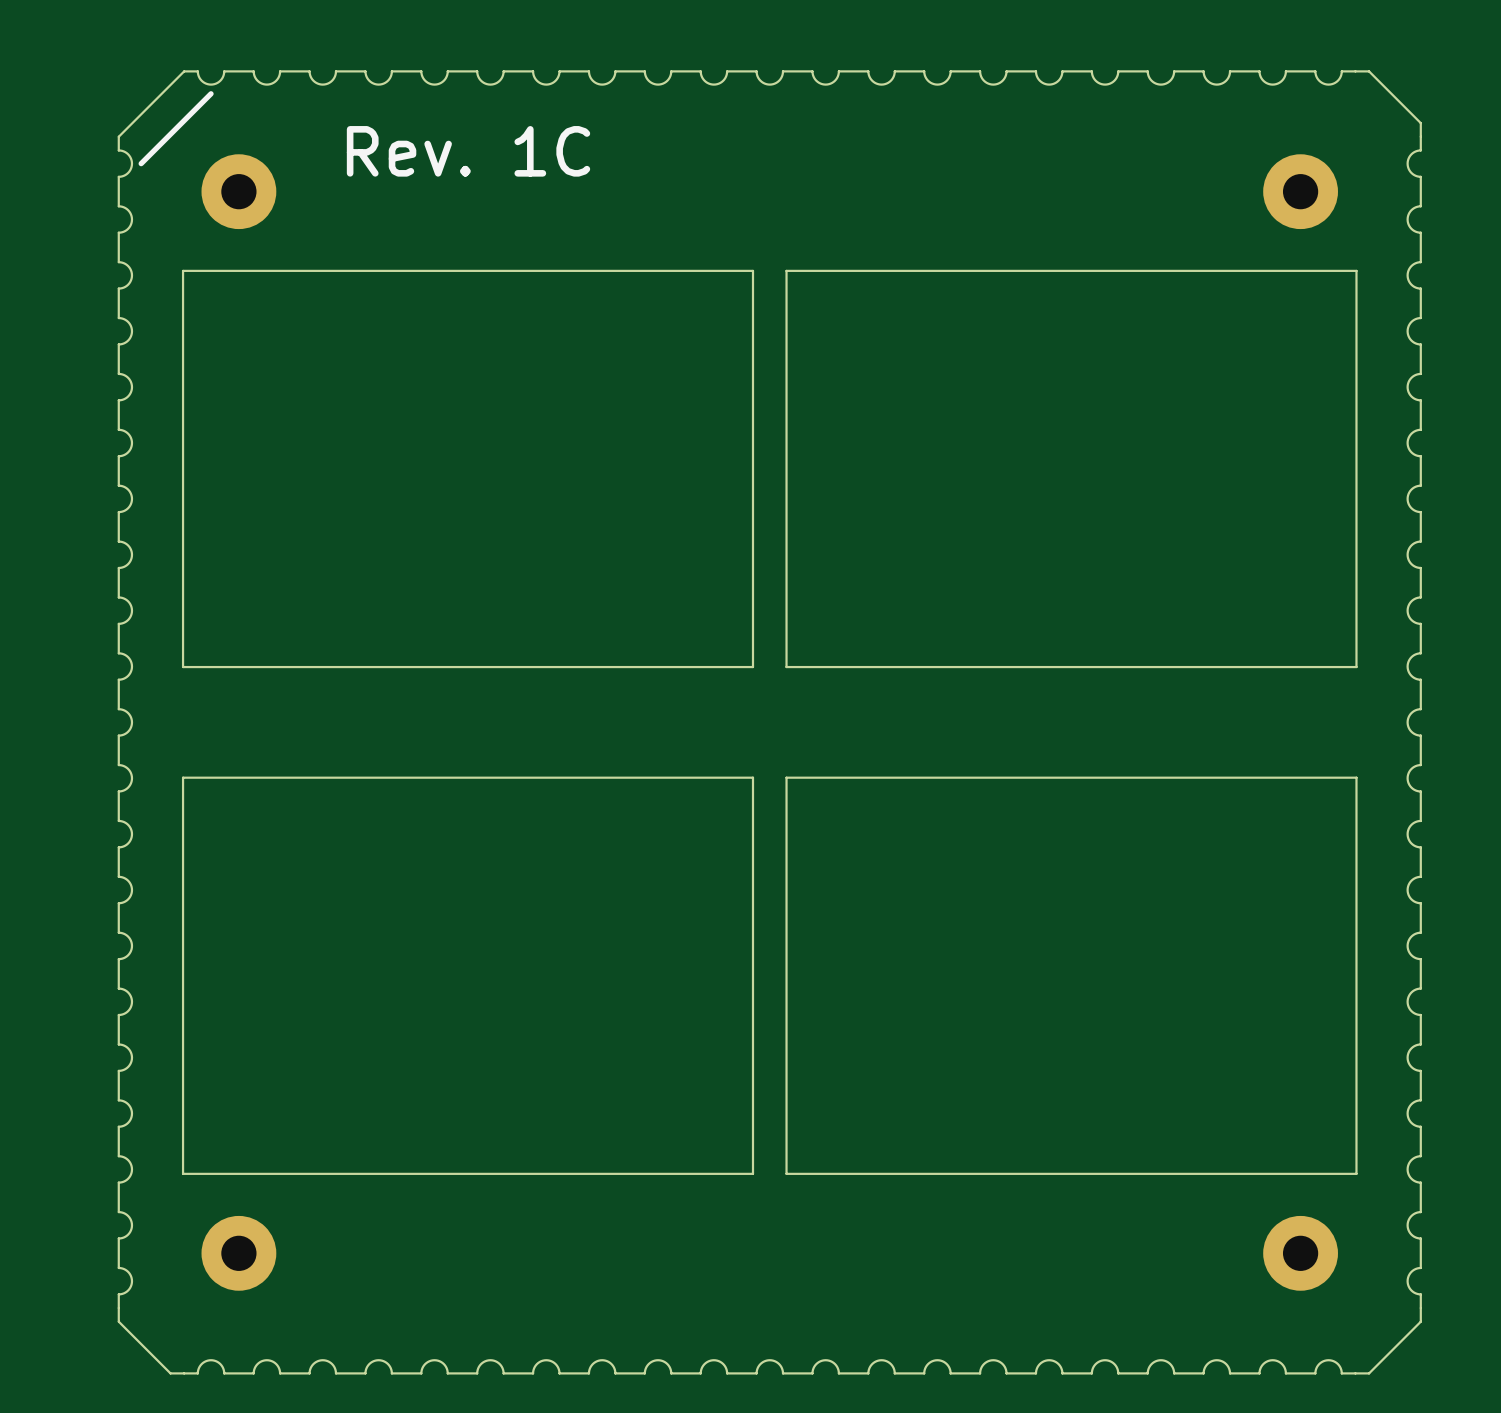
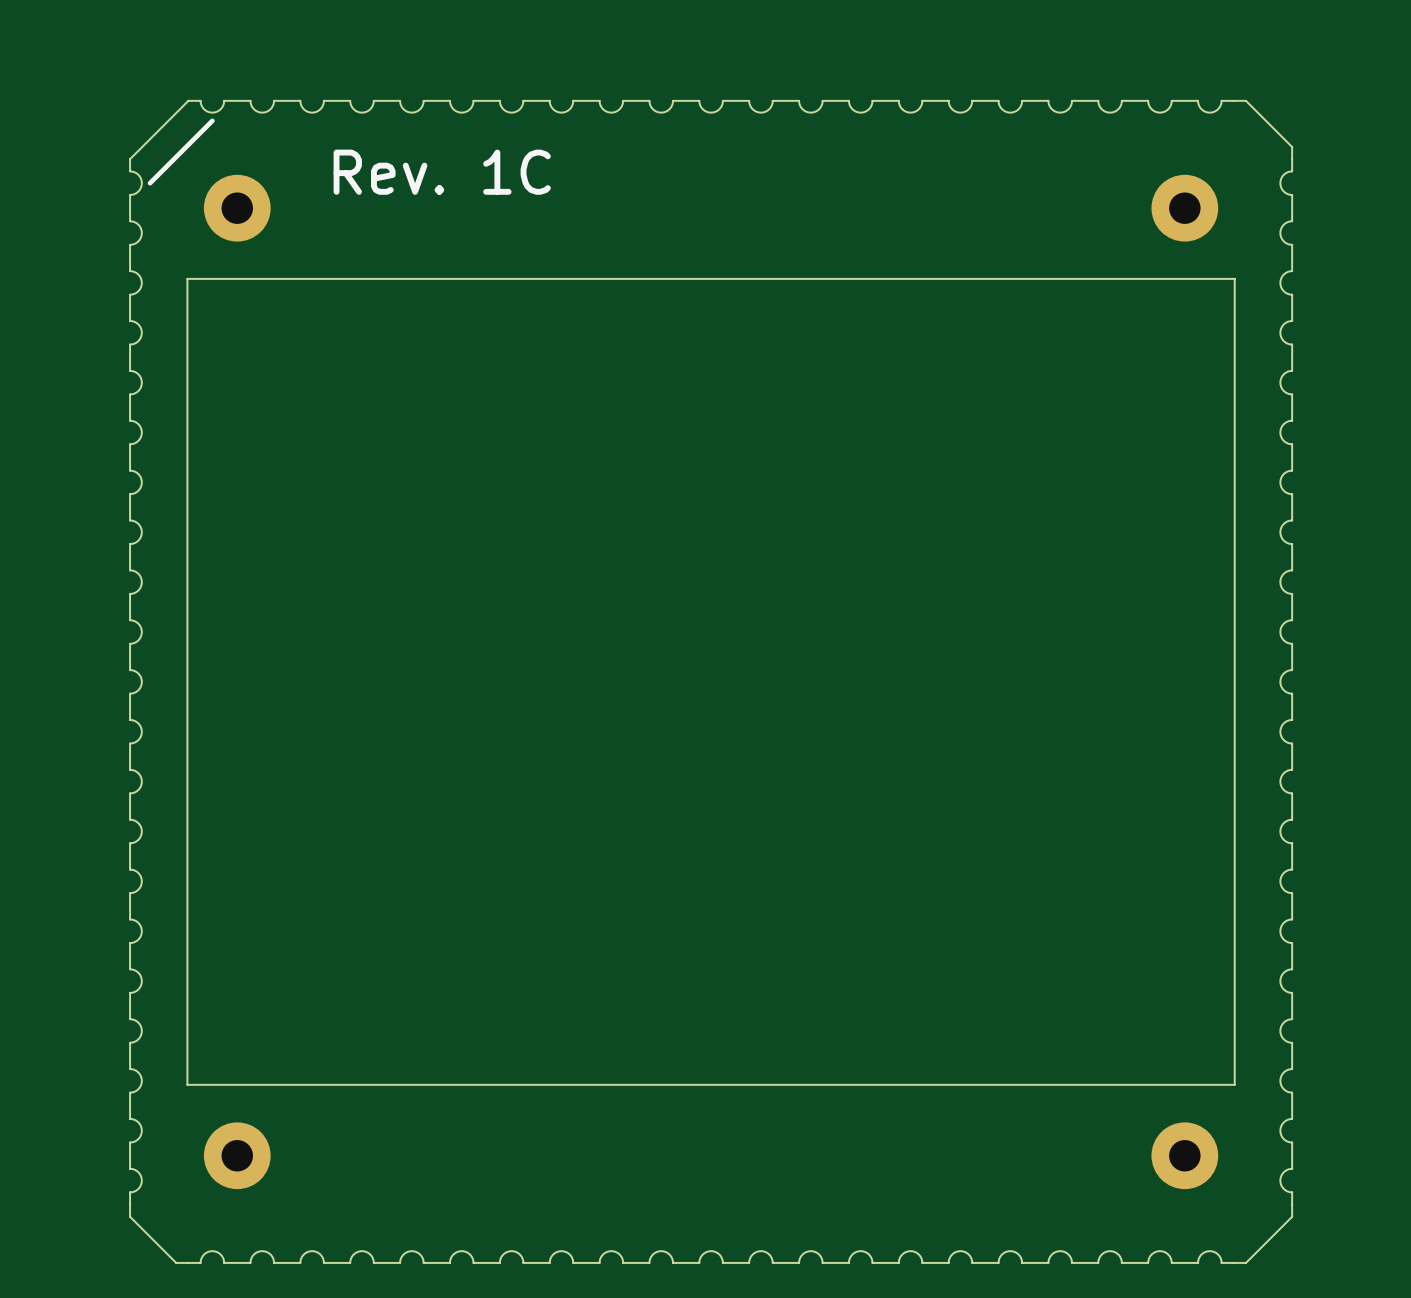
board edge: (753, 270) (753, 667) (183, 667) -> (696, 278) (726, 278)
board edge: (786, 270) (786, 667) (1356, 667) -> (1234, 731) (1234, 632)
board edge: none -> (187, 632) (187, 731)
board edge: (183, 777) (753, 777) (753, 1173) -> (726, 1084) (696, 1084)
board edge: (1356, 777) (786, 777) (786, 1173) -> none

